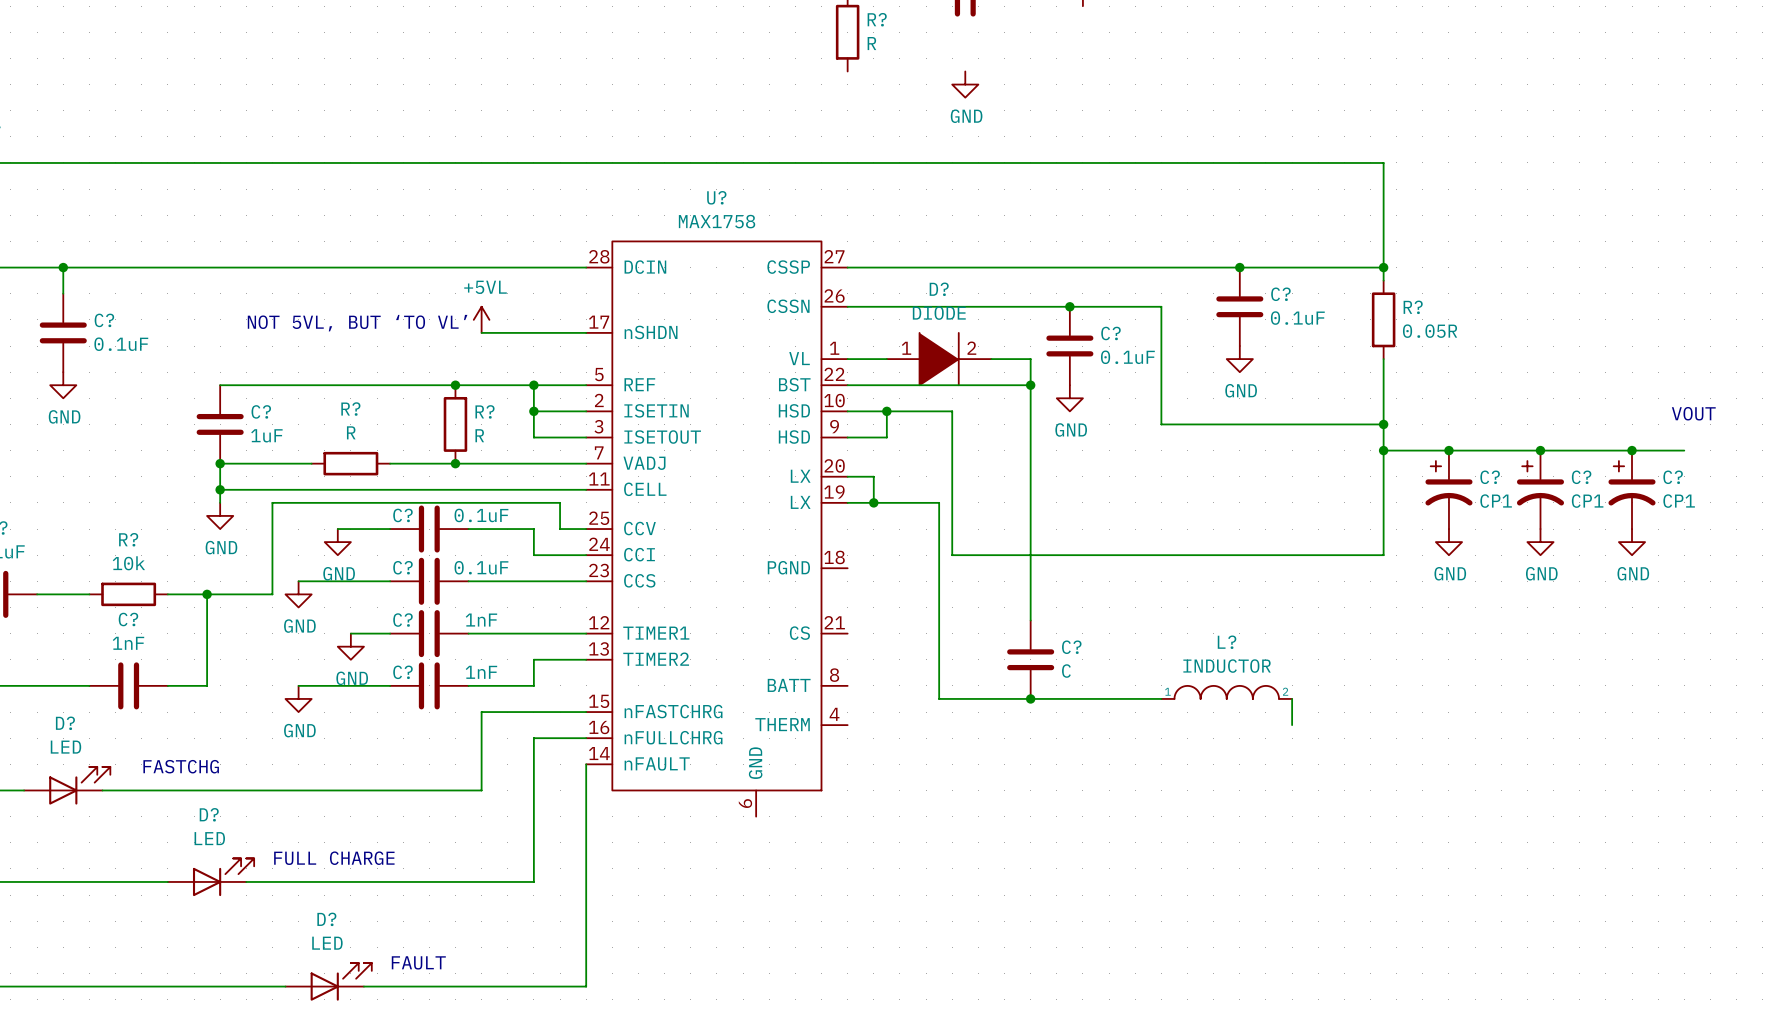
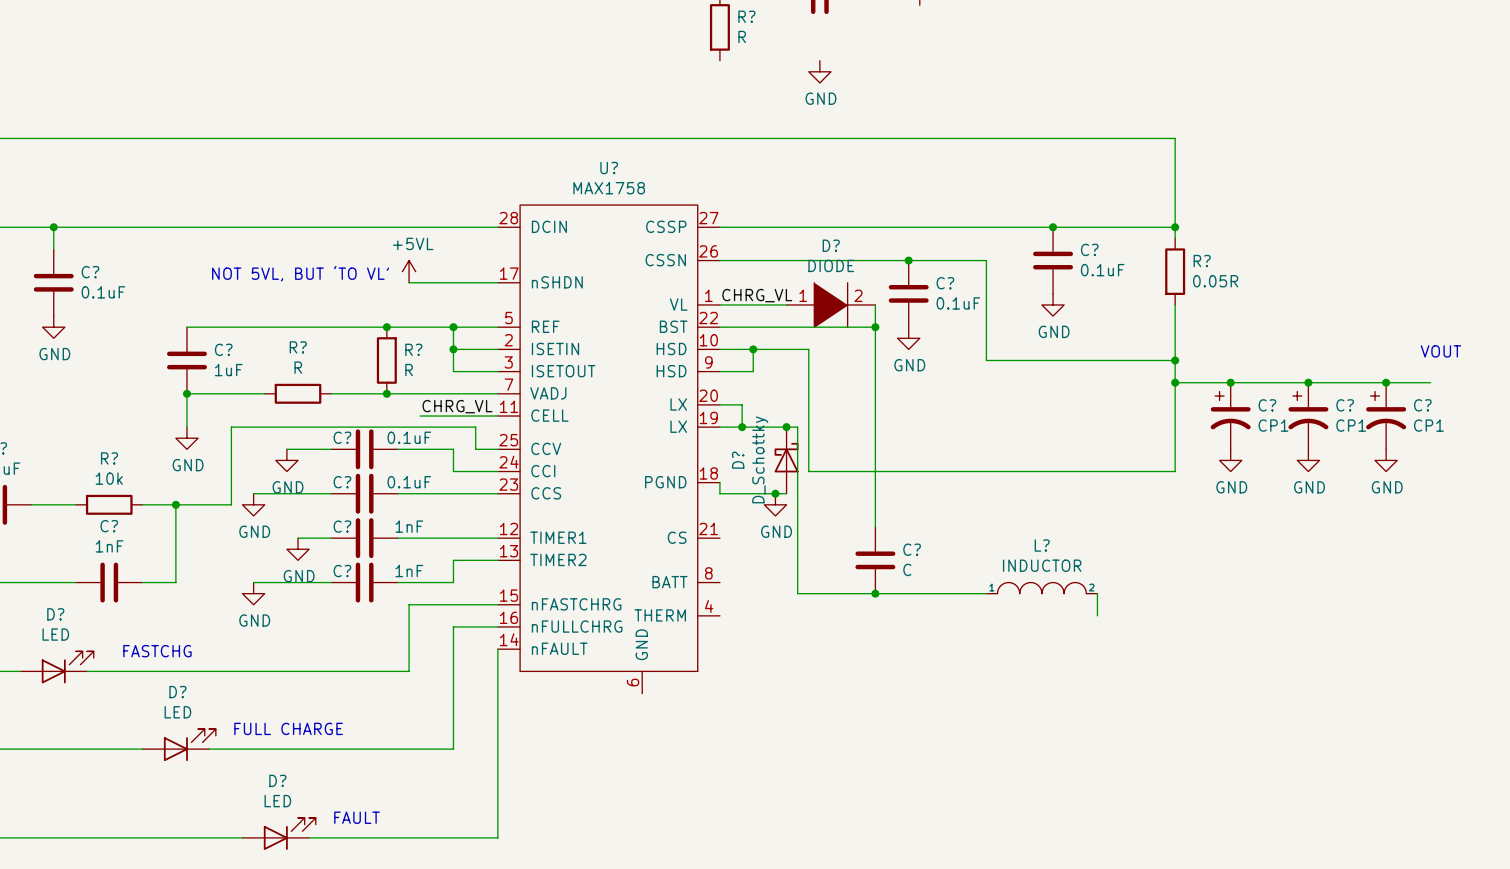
label: none -> CHRG_VL (757, 295)
D? position: (939, 359) -> (830, 304)
label: none -> CHRG_VL (457, 406)
wire: (220, 489) (494, 489) -> none
junction: (220, 489) -> none
junction: none -> (786, 427)
D?: none -> D_Schottky (786, 460)
wire: none -> (719, 482) (719, 493) (786, 493)
junction: none -> (775, 493)
power symbol: none -> GND (775, 504)

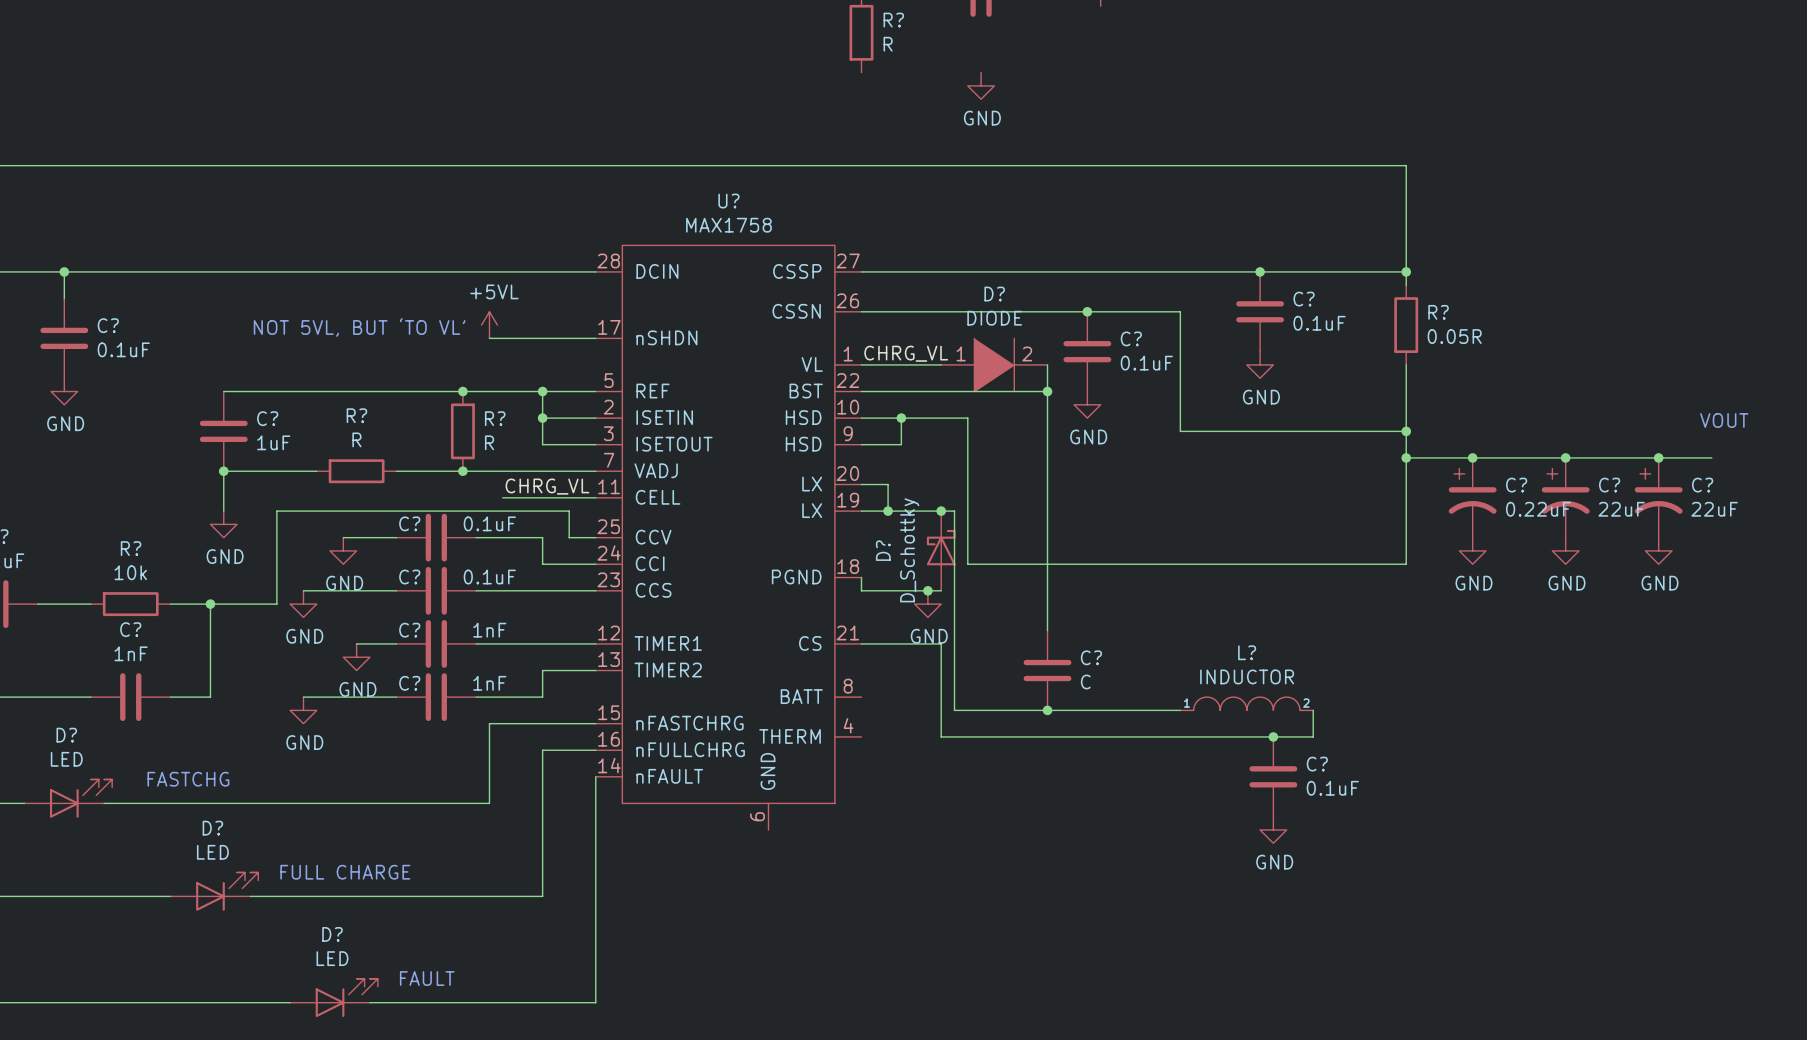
C? value: CP1 (1273, 425) -> 0.22uF (1538, 509)
C? value: CP1 (1351, 425) -> 22uF (1621, 509)
C? value: CP1 (1428, 425) -> 22uF (1714, 509)
wire: none -> (861, 643) (941, 643) (941, 736) (1313, 736)
junction: none -> (1273, 736)
C?: none -> 0.1uF (1273, 776)
power symbol: none -> GND (1273, 829)

